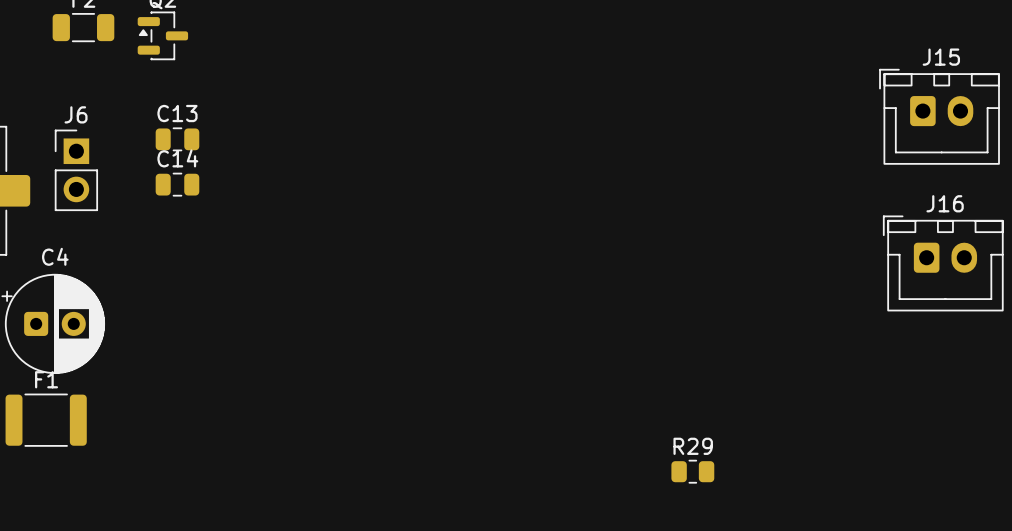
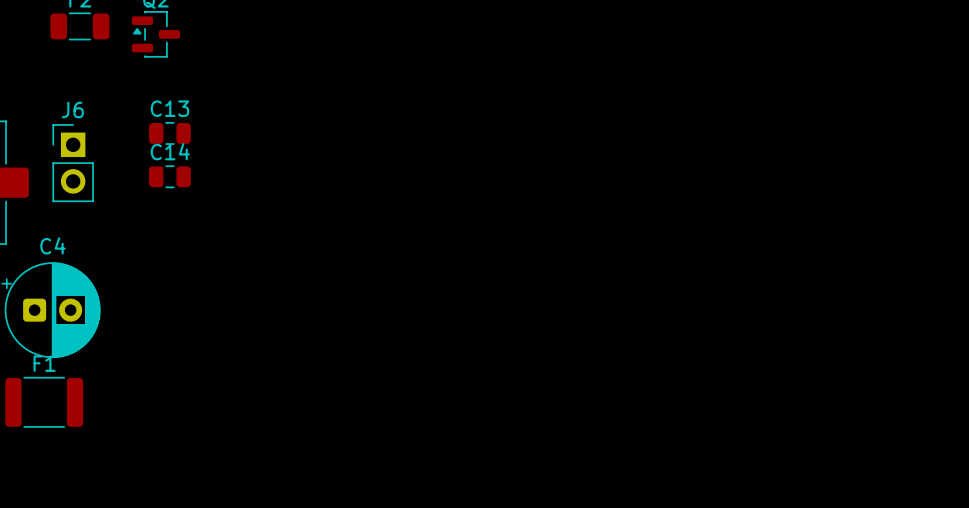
J15: (939, 116) -> none
J16: (943, 263) -> none
R29: (692, 471) -> none

